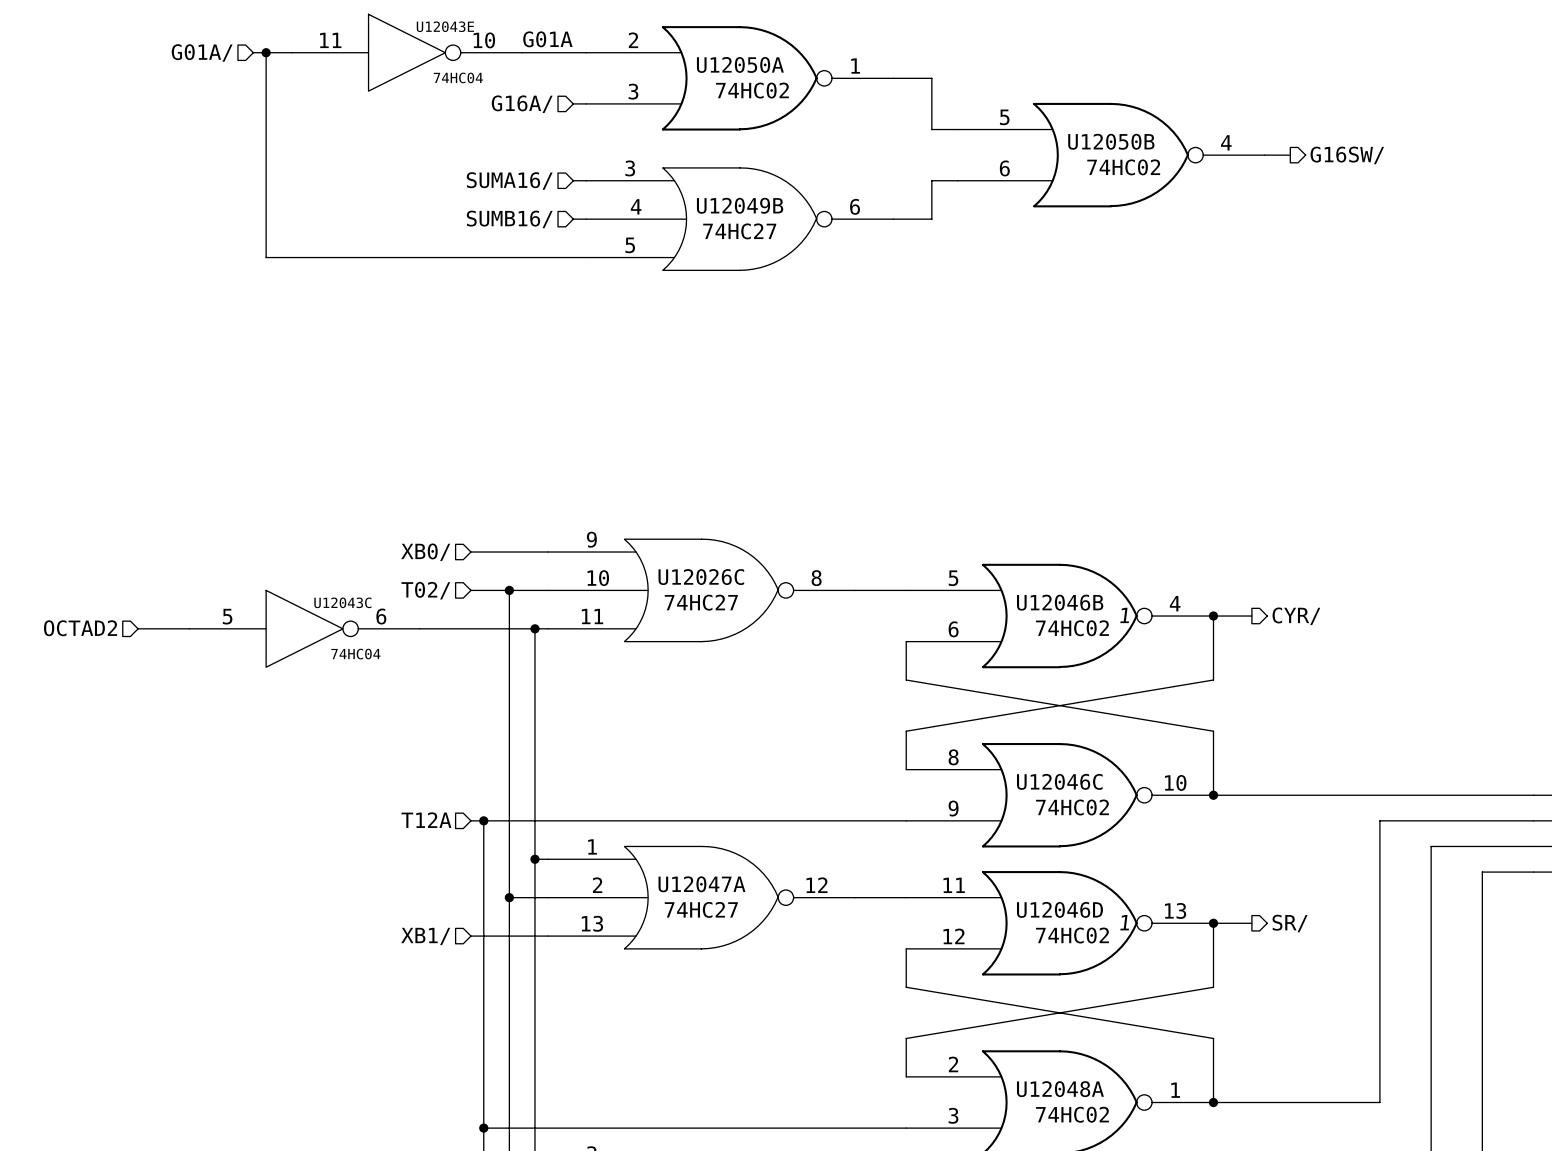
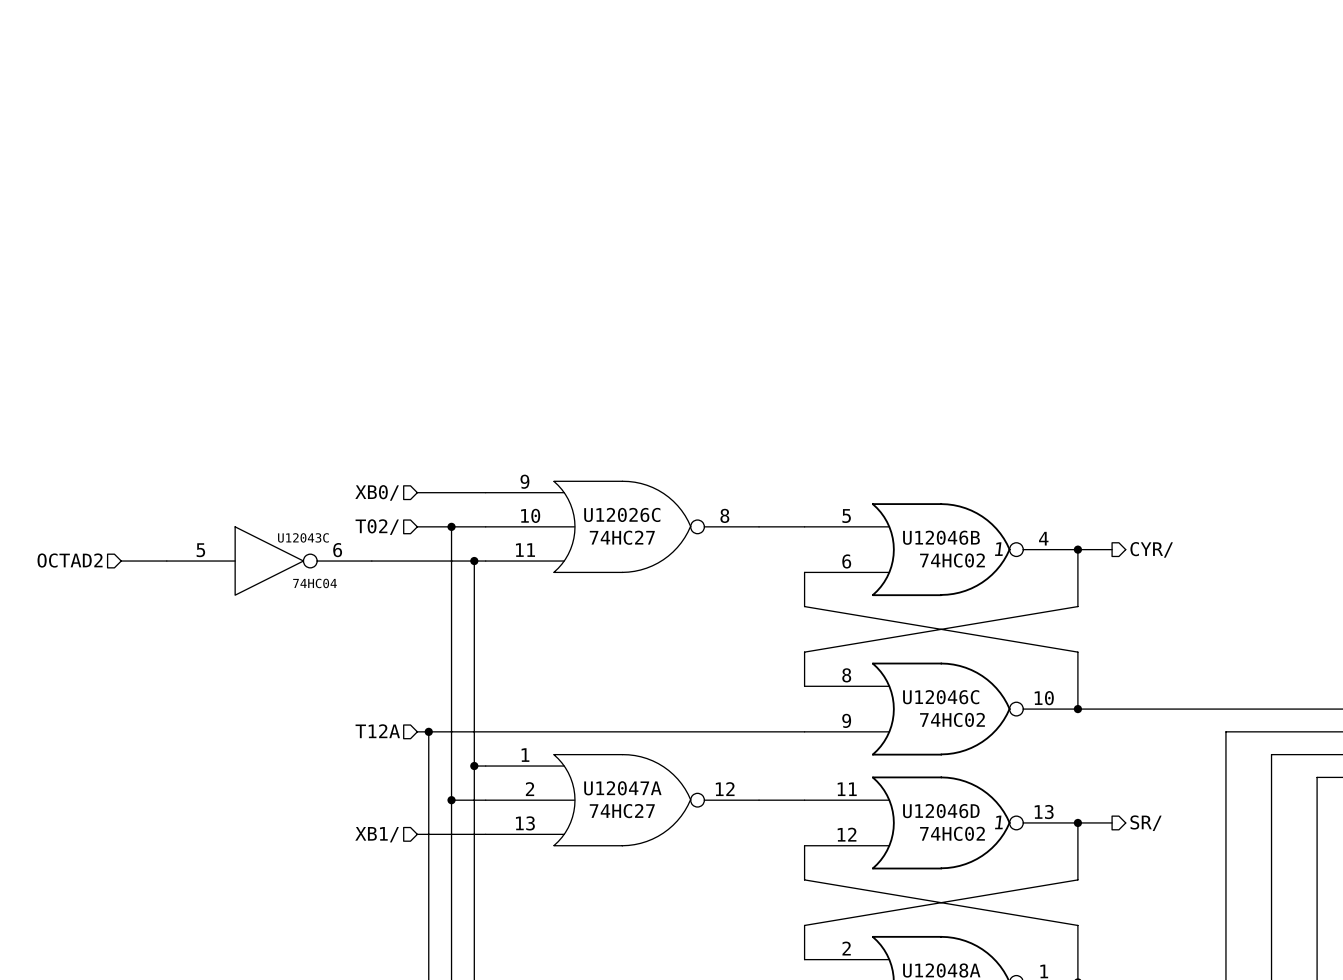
label: G01A (547, 39) -> none
hierarchical label: G01A/ (202, 52) -> none
wire: (253, 52) (291, 52) -> none
wire: (266, 52) (266, 257) (586, 257) -> none
junction: (266, 52) -> none
U12043E: 74HC04 (406, 52) -> none
wire: (522, 52) (586, 52) -> none
U12050A: 74HC02 (739, 78) -> none
wire: (893, 78) (931, 78) (931, 129) (957, 129) -> none
wire: (573, 103) (586, 103) -> none
hierarchical label: G16A/ (522, 104) -> none
U12050B: 74HC02 (1111, 155) -> none
wire: (1264, 155) (1290, 155) -> none
hierarchical label: G16SW/ (1347, 155) -> none
wire: (573, 180) (586, 180) -> none
wire: (957, 180) (931, 180) (931, 219) (893, 219) -> none
hierarchical label: SUMA16/ (509, 181) -> none
hierarchical label: SUMB16/ (509, 219) -> none
wire: (573, 219) (586, 219) -> none
U12049B: 74HC27 (739, 219) -> none

